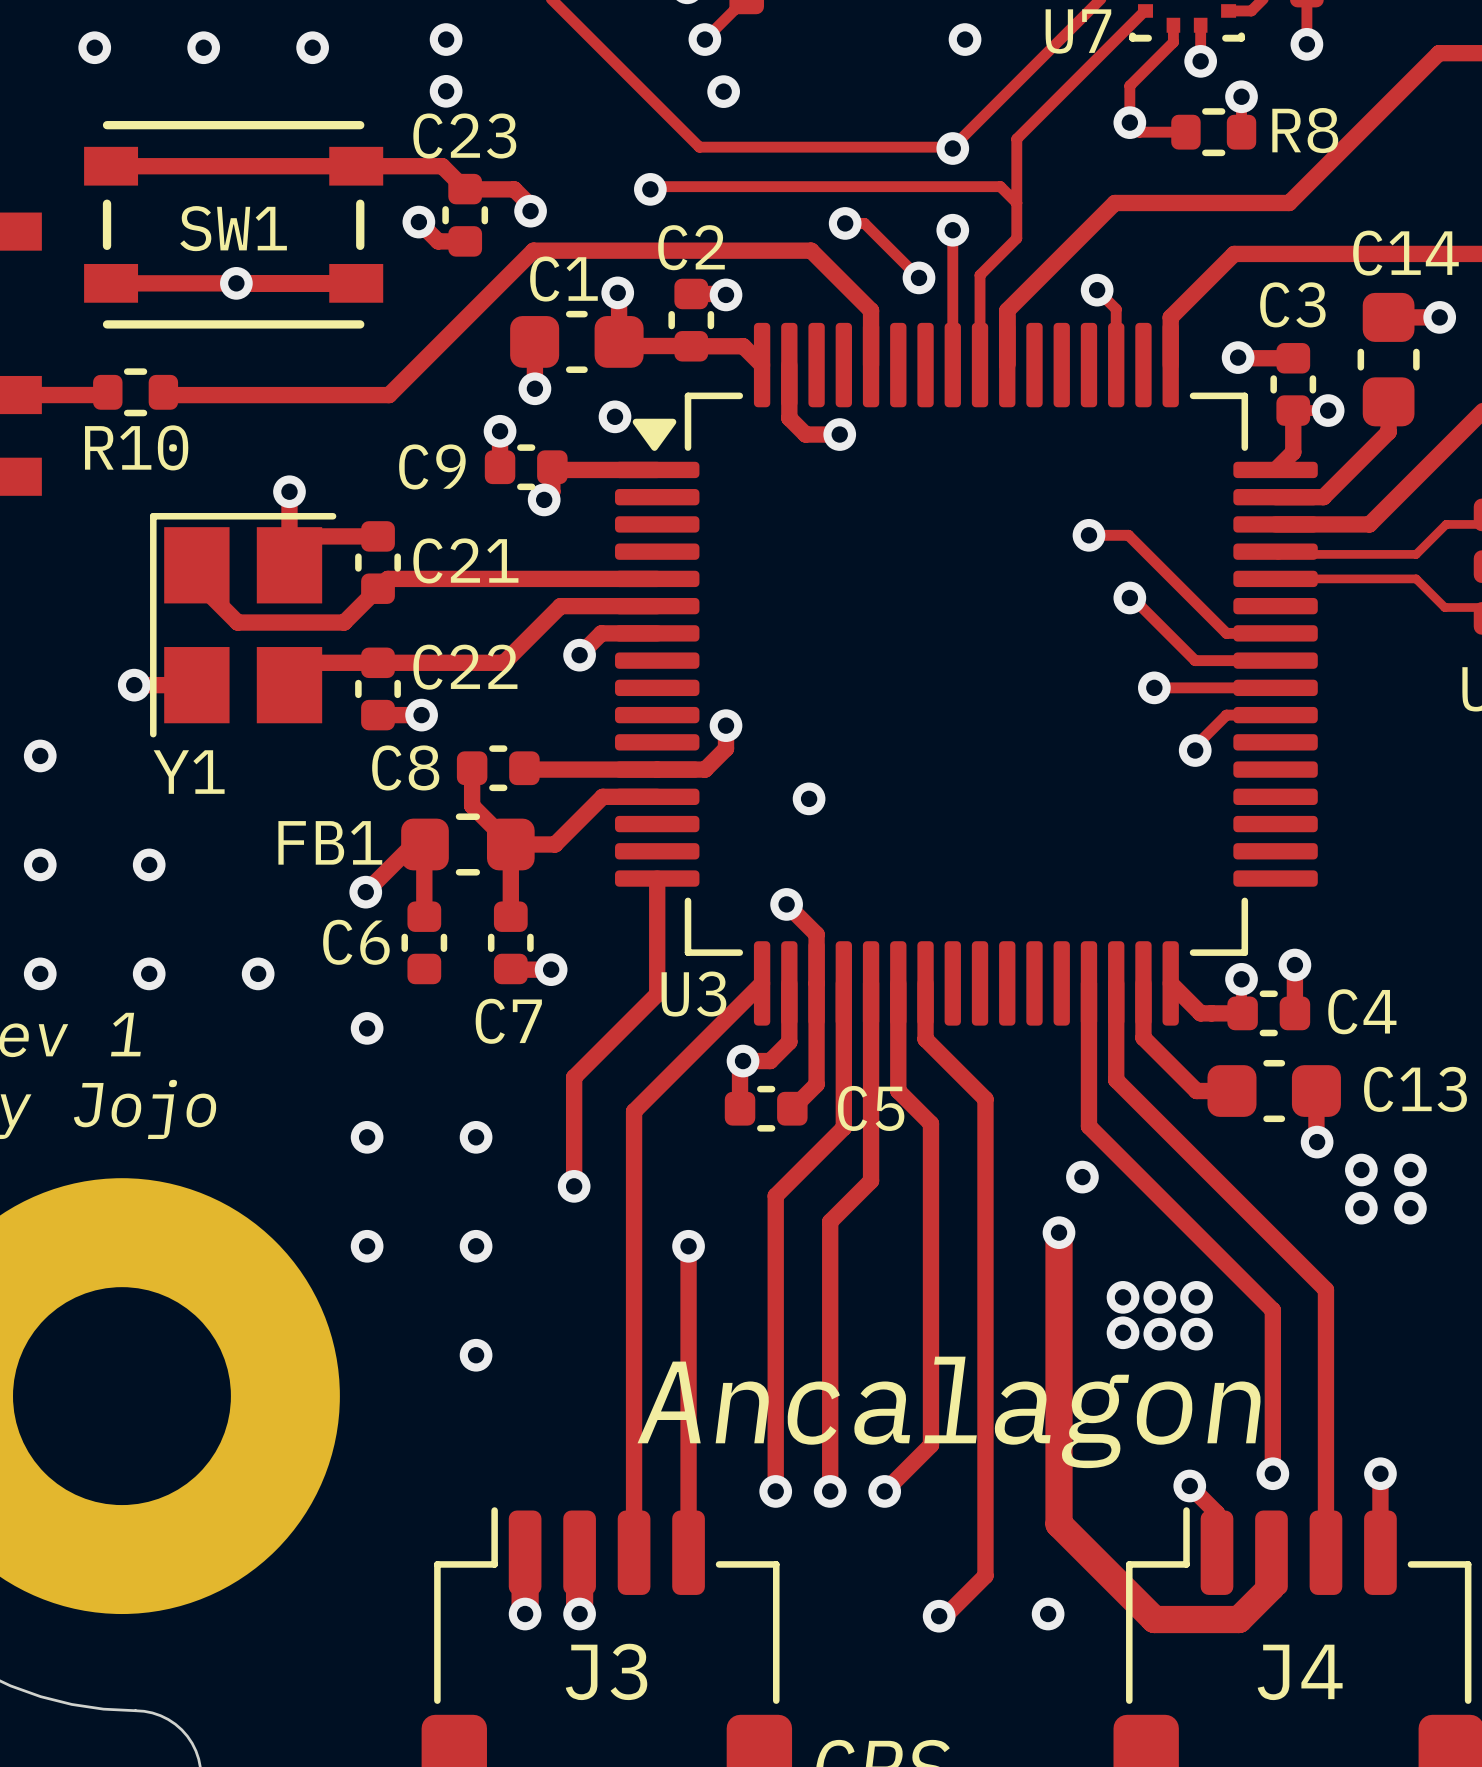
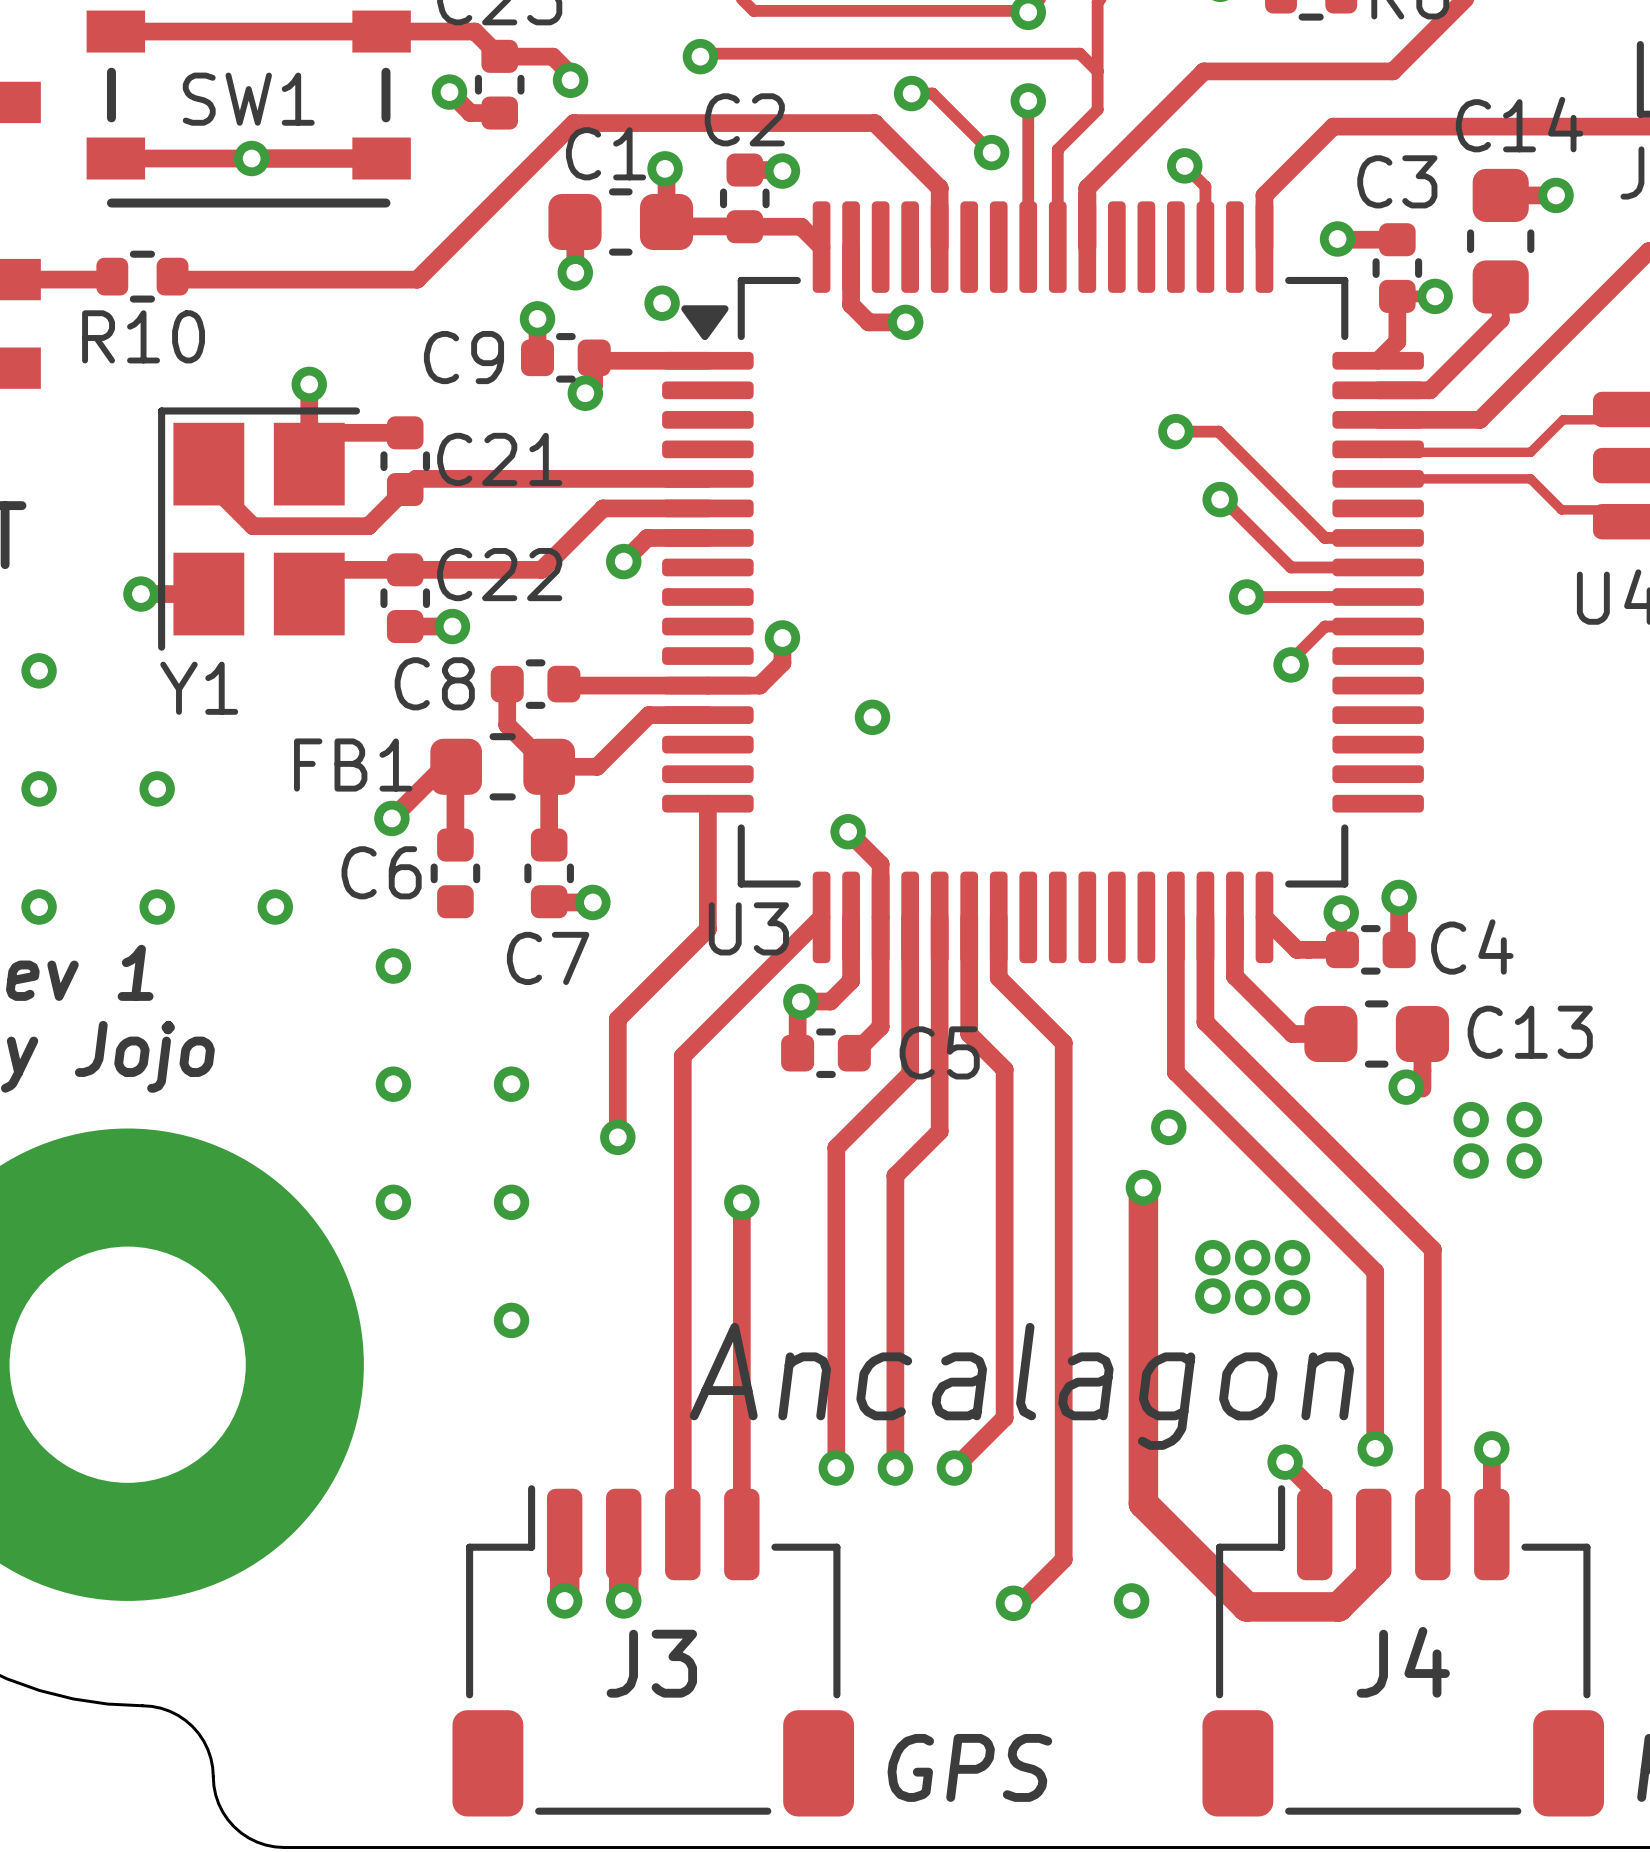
via position: (1317, 1142) -> (1406, 1087)

